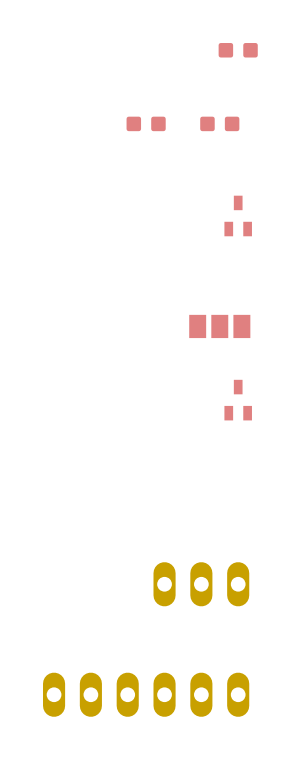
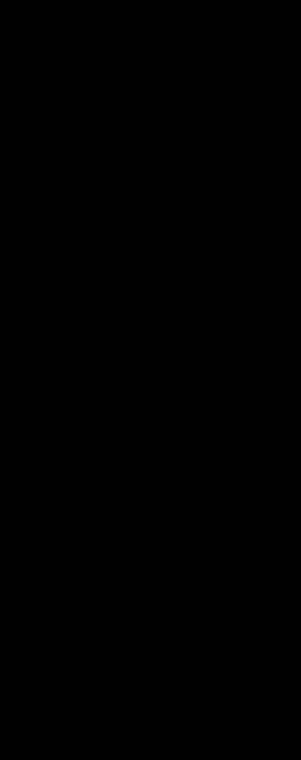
part: (238, 50) -> none
part: (146, 123) -> none
part: (219, 123) -> none
part: (238, 215) -> none
part: (219, 326) -> none
part: (238, 400) -> none
part: (201, 584) -> none
part: (146, 694) -> none

